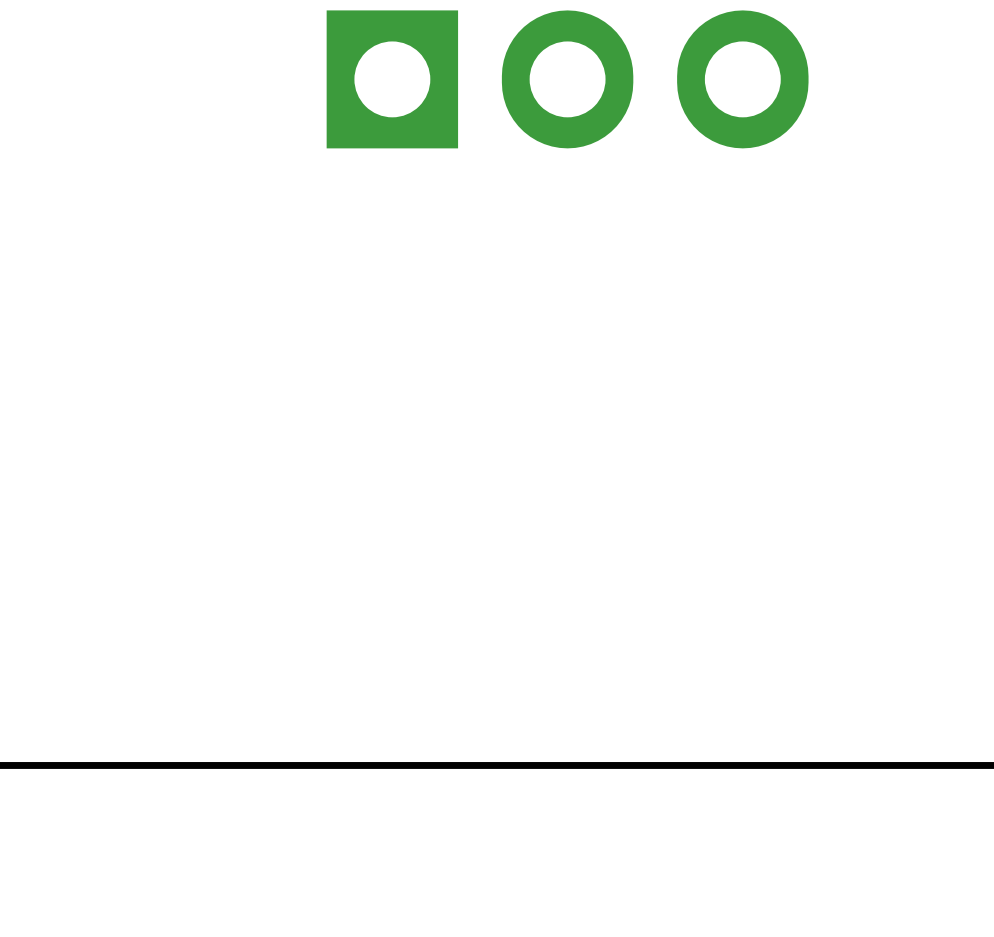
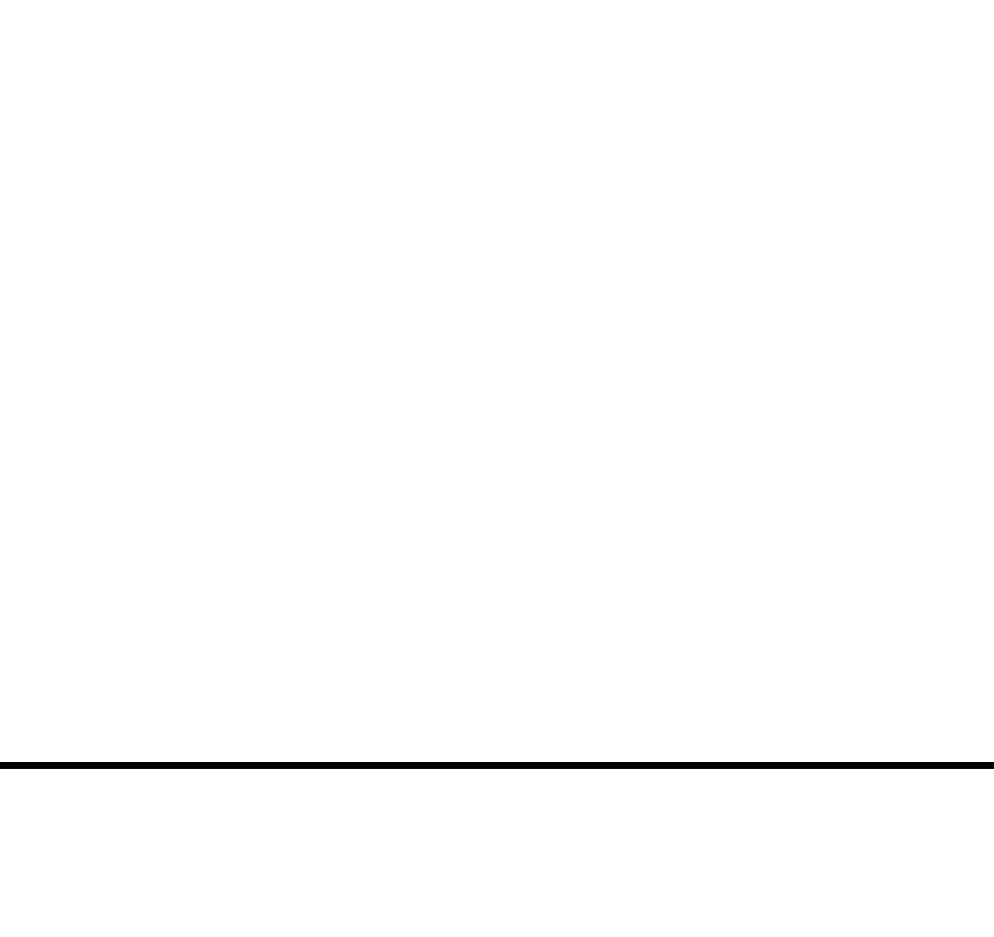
part: (567, 79) -> none

